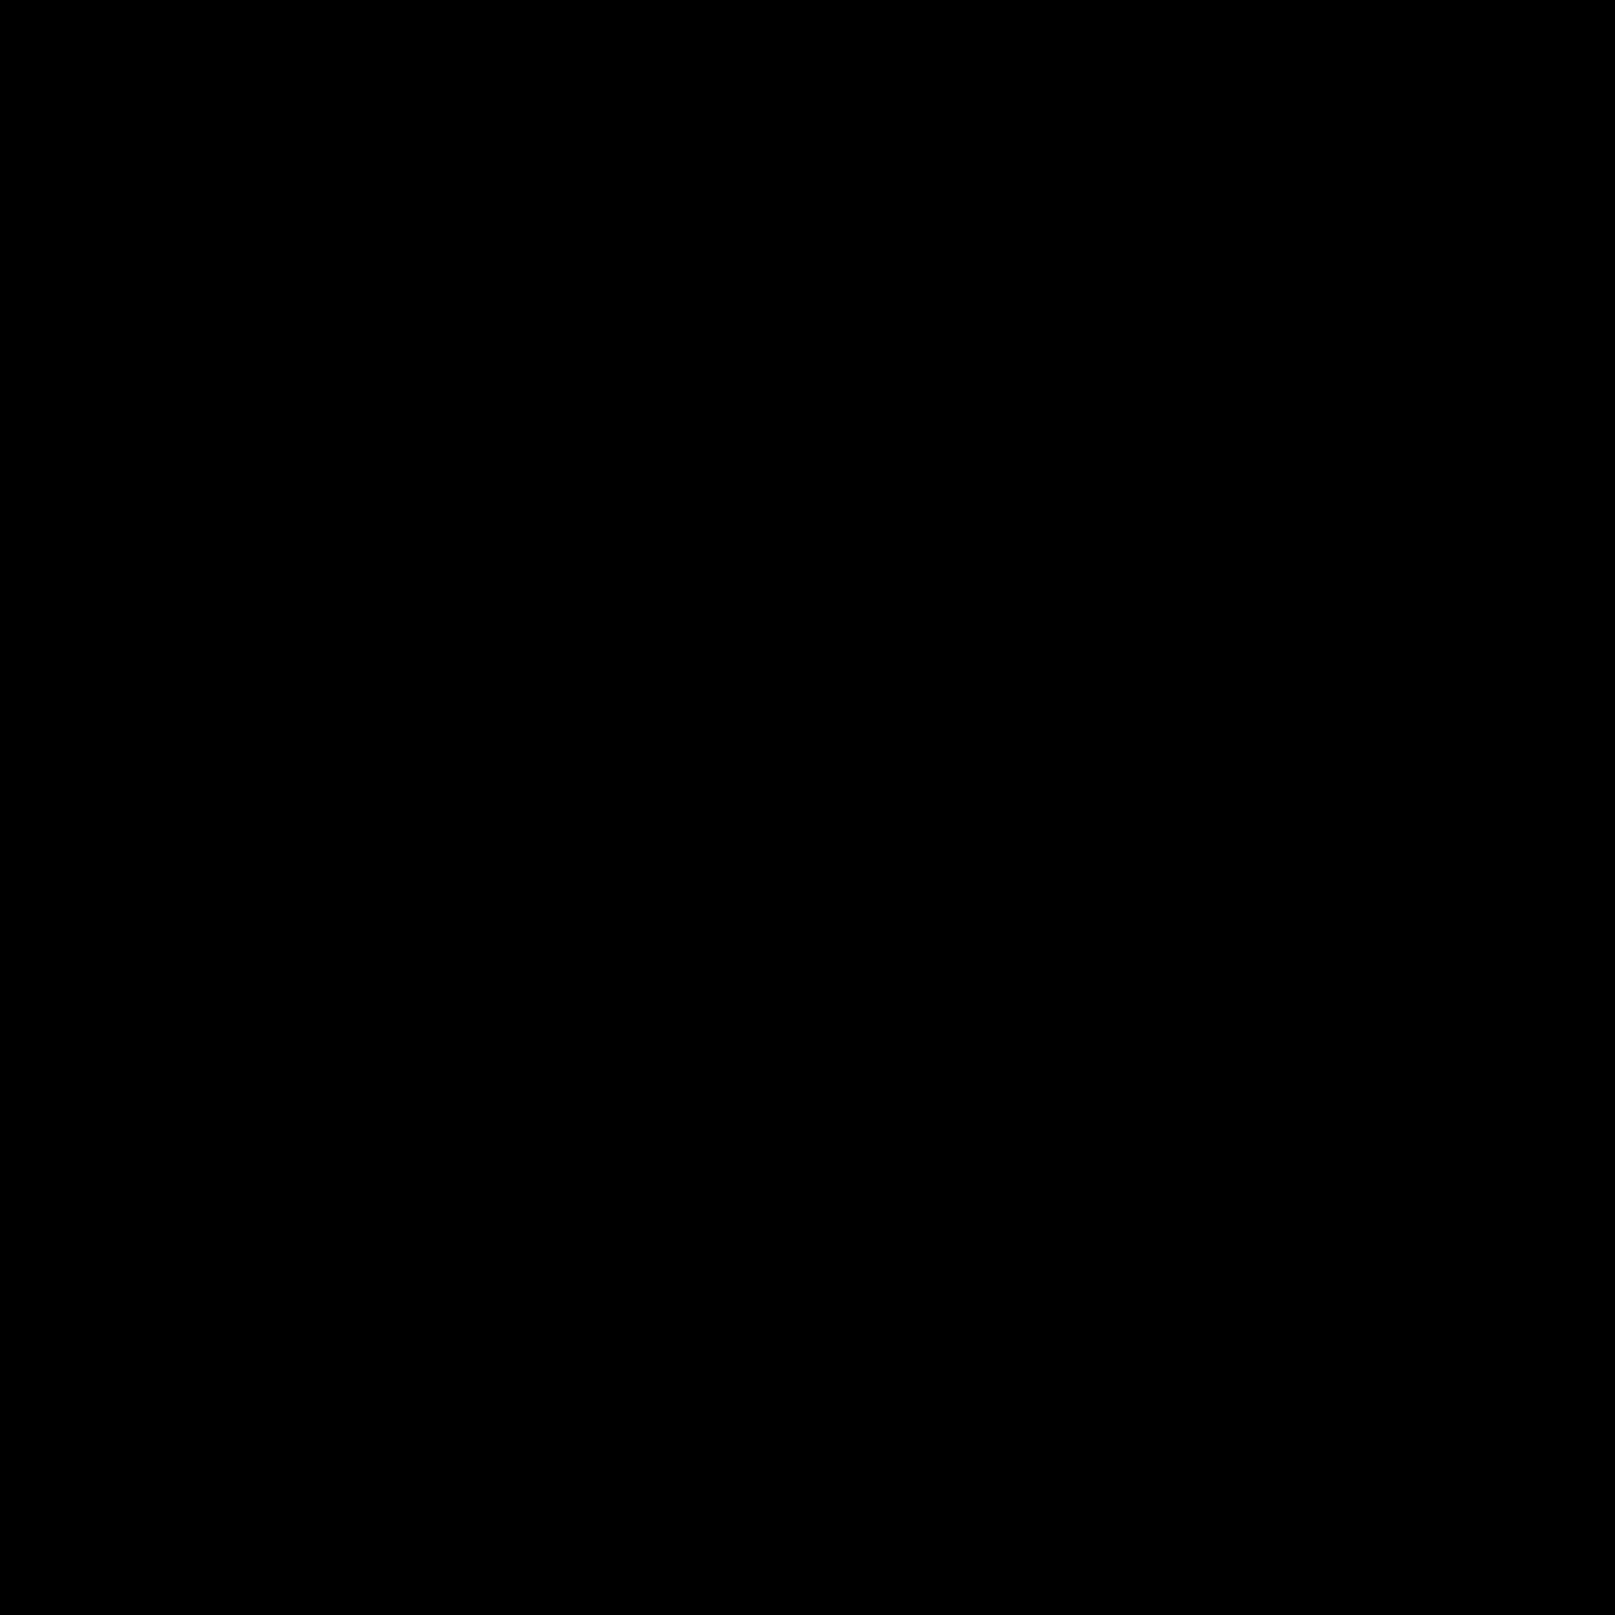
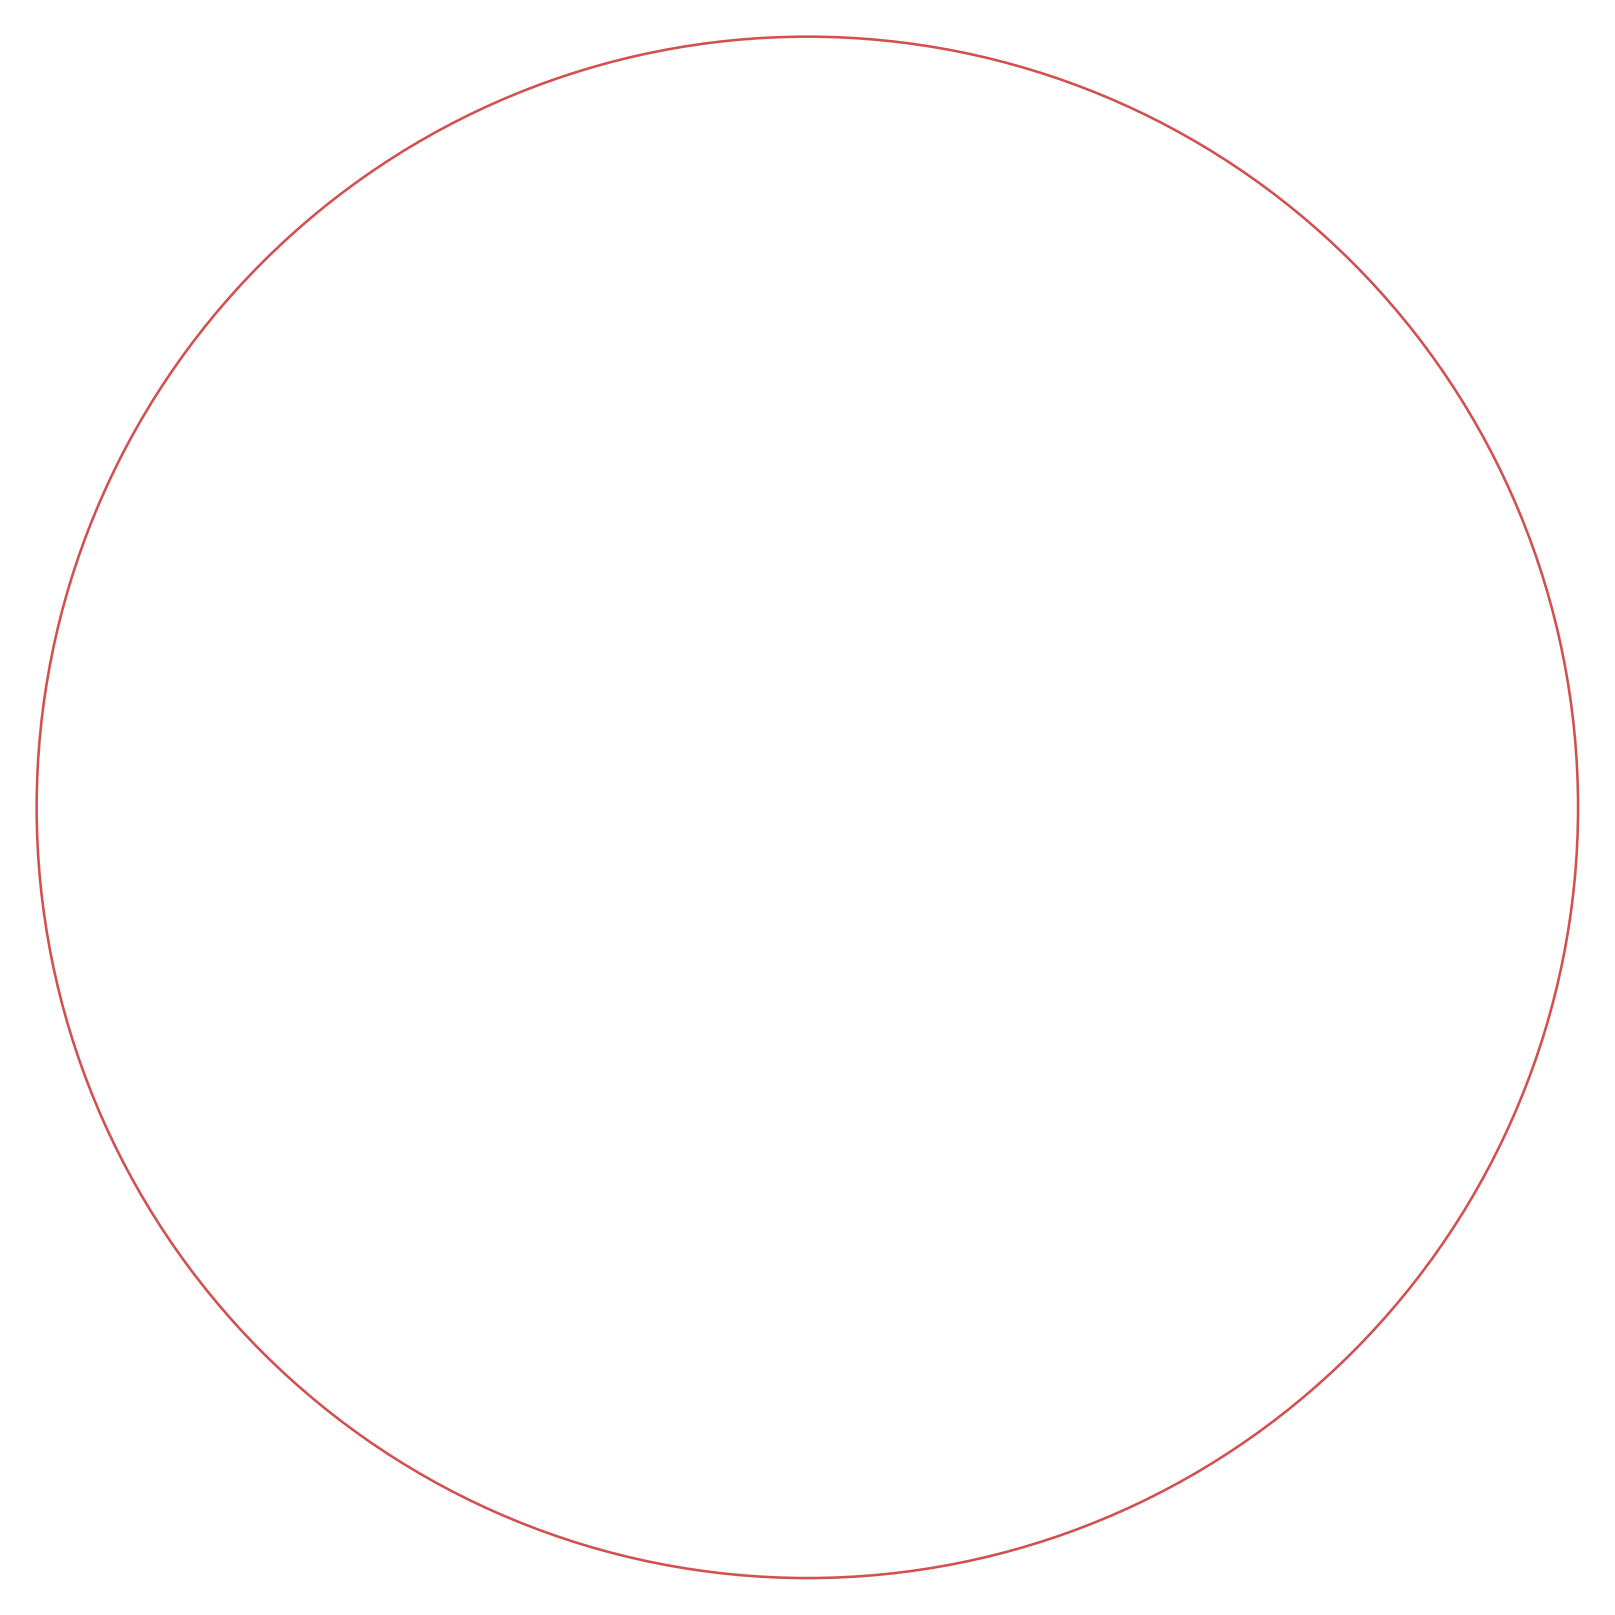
drawing: none -> [35, 35, 1580, 1580]

